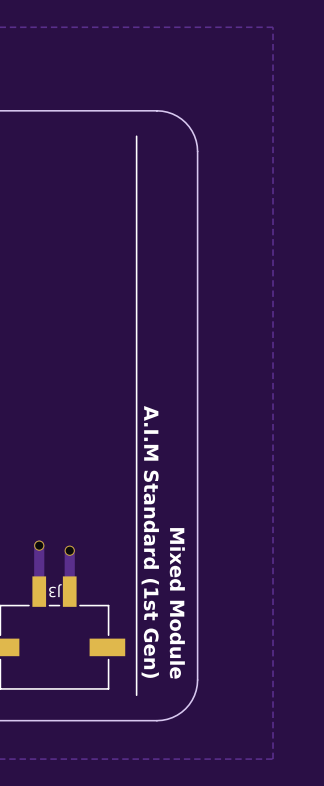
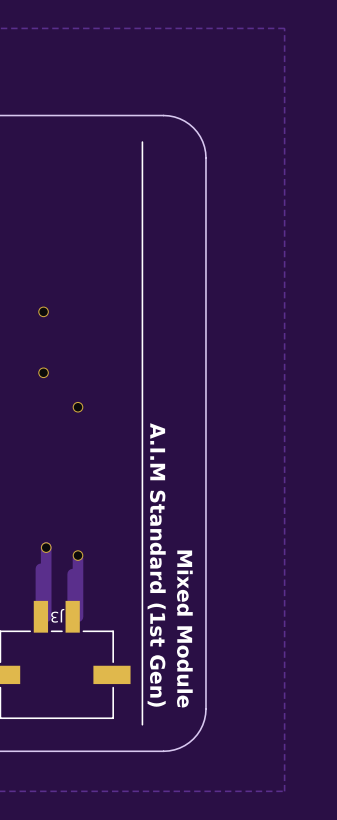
via: none -> (43, 311)
via: none -> (43, 372)
via: none -> (77, 407)
track: none -> (46, 547) (46, 616)
via: none -> (46, 547)
via: none -> (77, 555)
track: none -> (77, 558) (77, 616)
via: (39, 545) -> none
via: (69, 550) -> none

